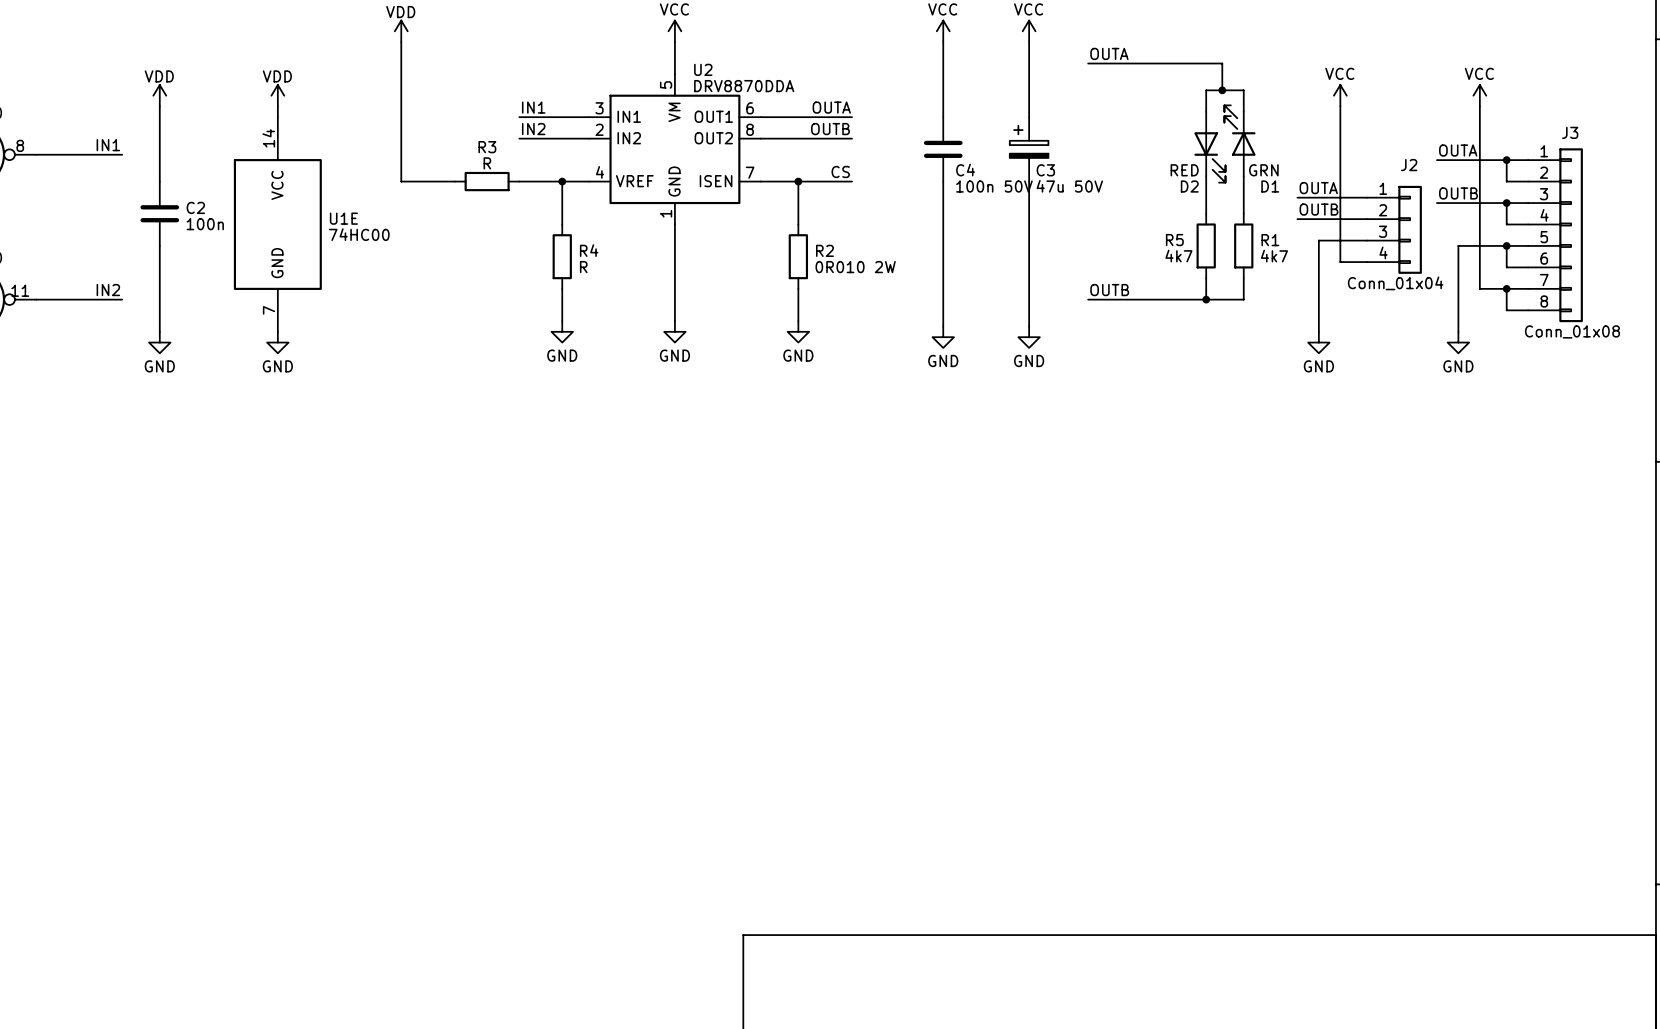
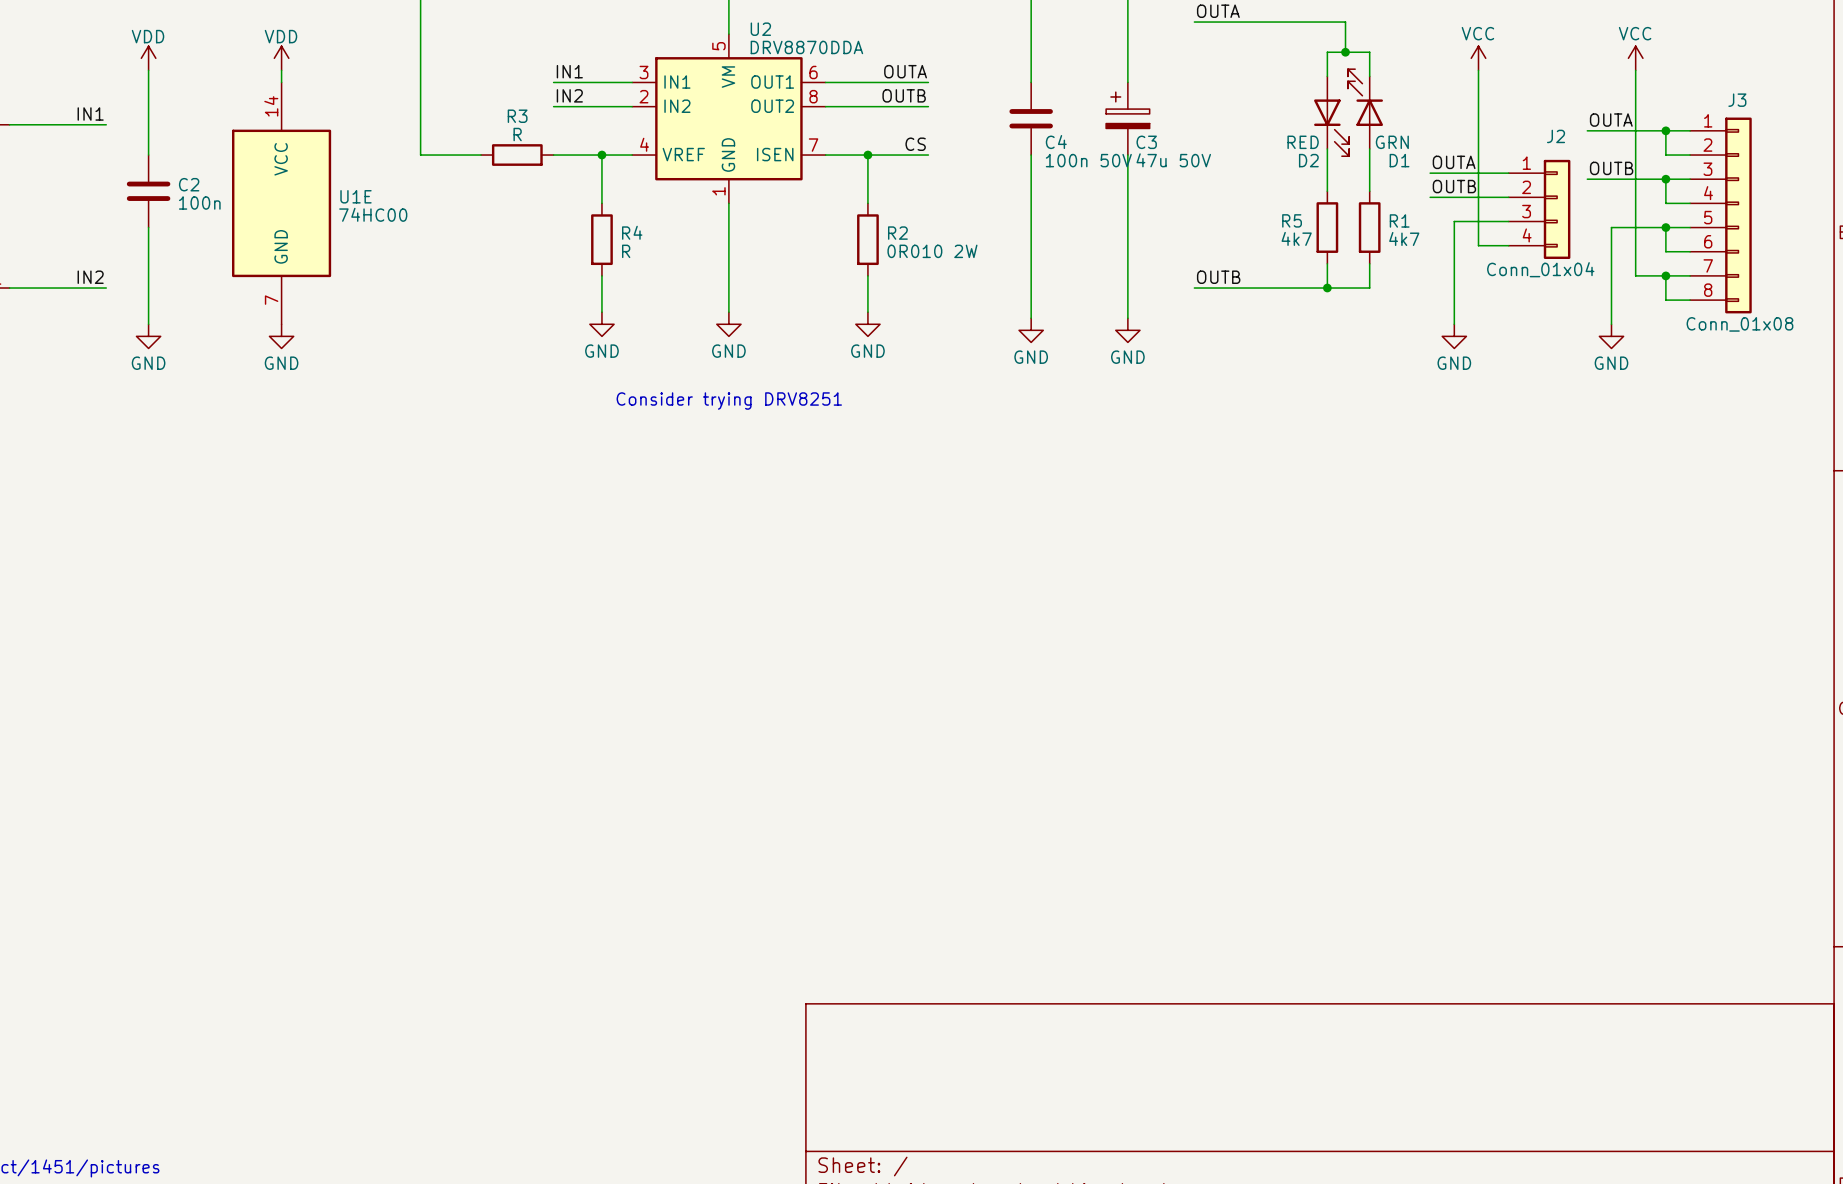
text: none -> Consider trying DRV8251 (729, 401)

